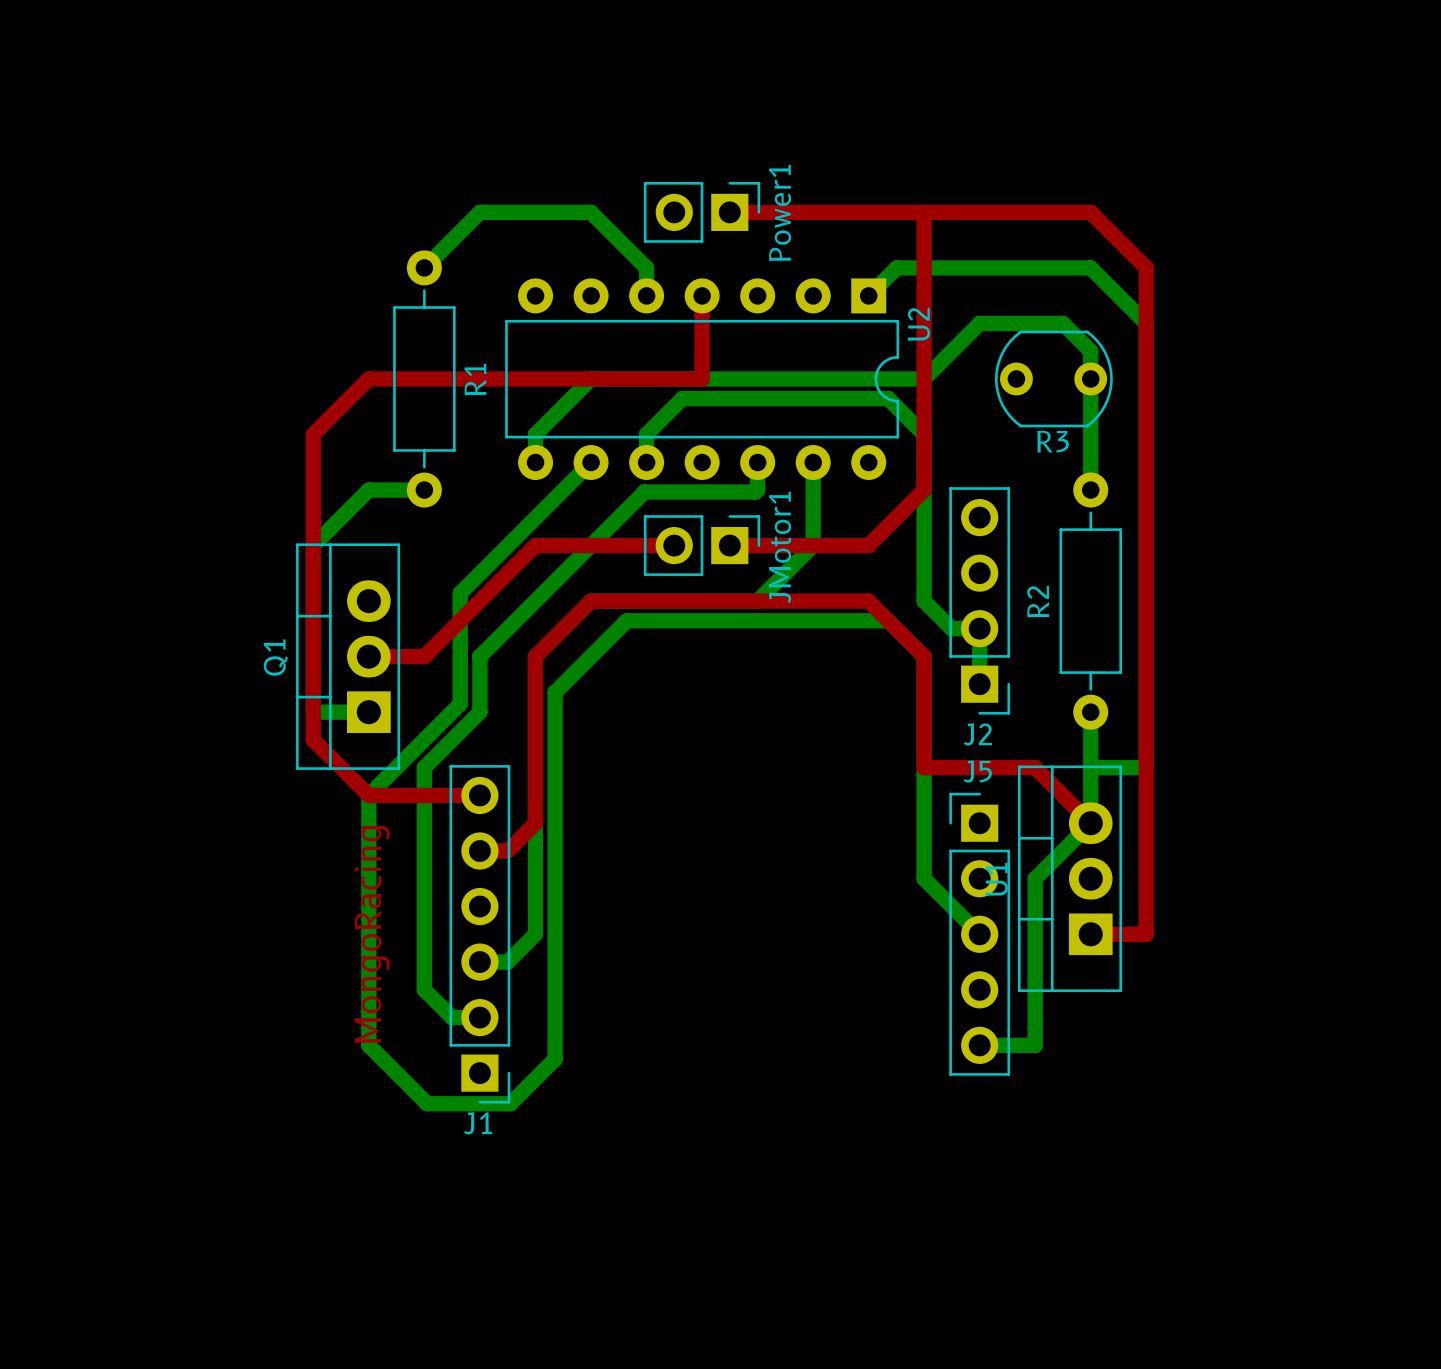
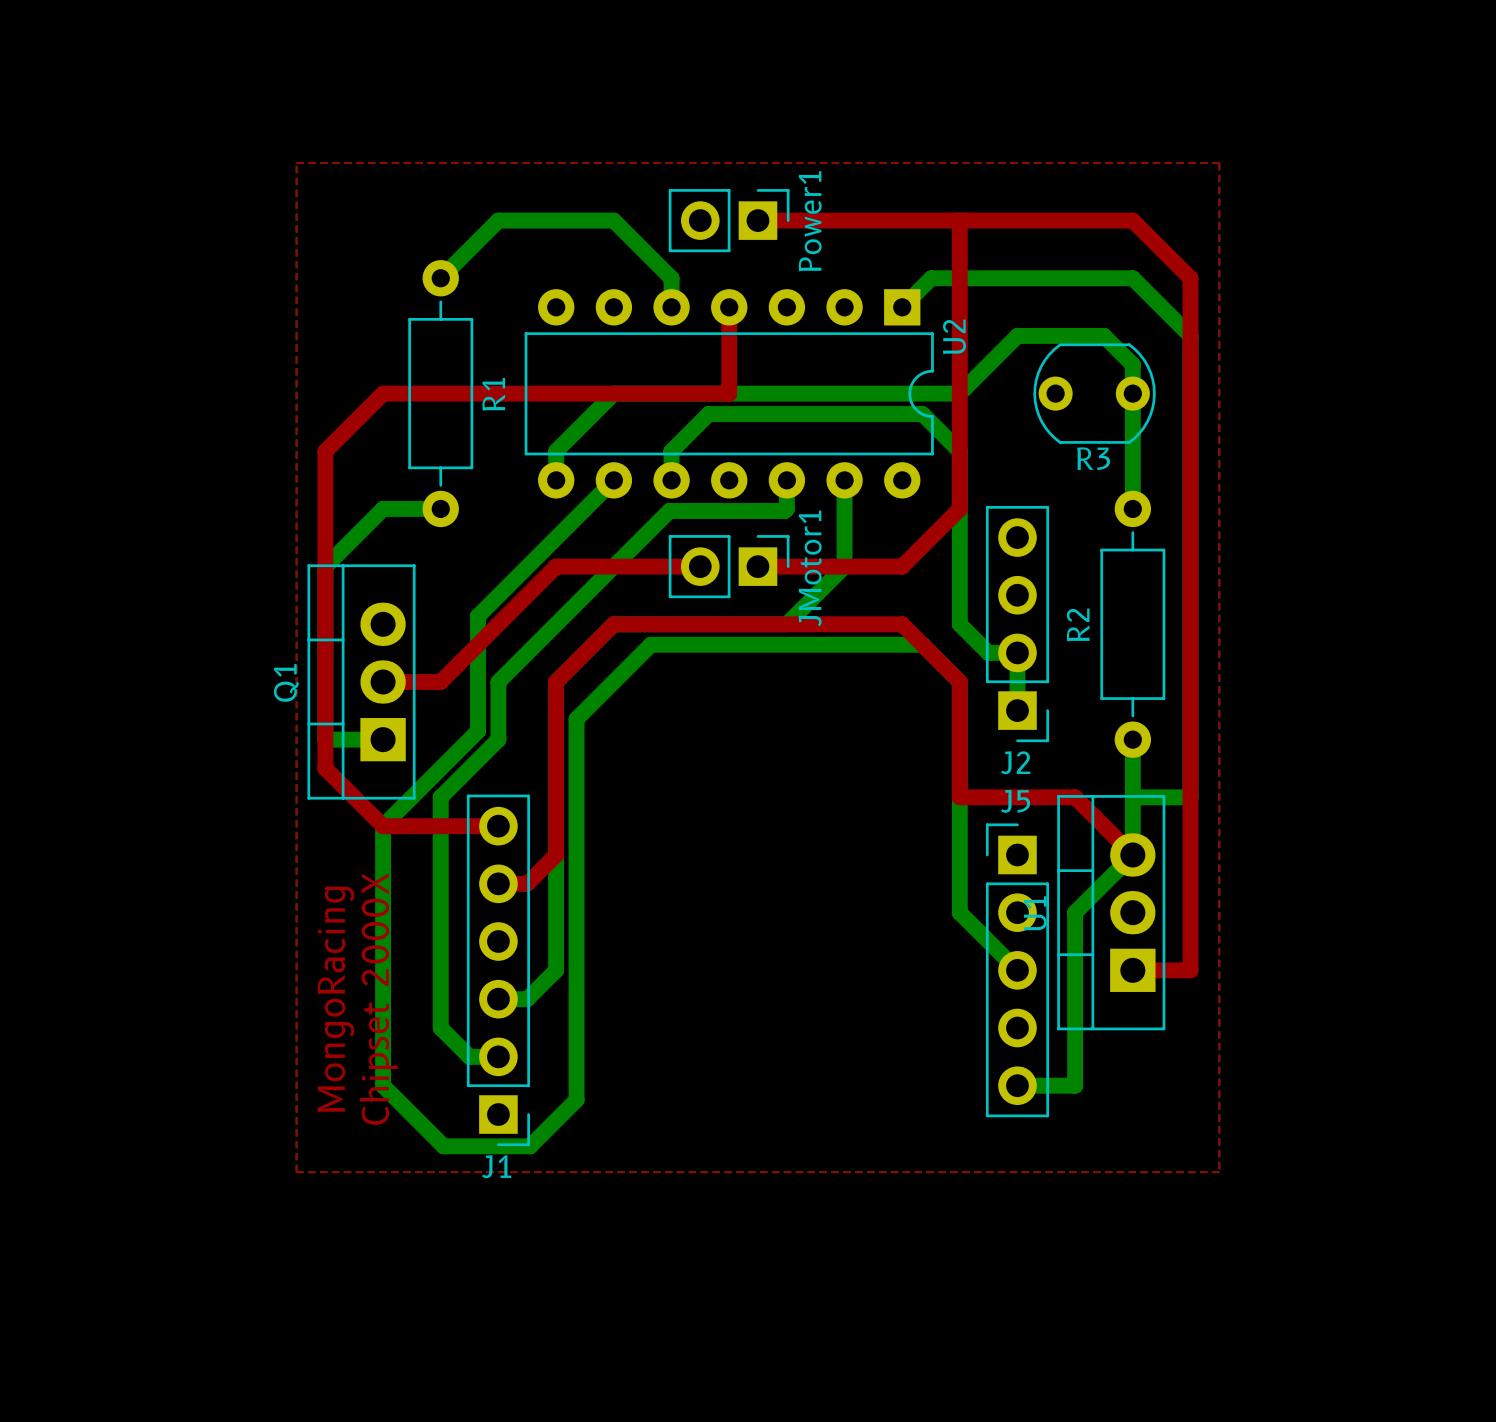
top zone outline: none -> (296, 162) (296, 1172) (1219, 1172) (1219, 162) (296, 162)
text position: MongoRacing (372, 934) -> MongoRacing (335, 999)
text: none -> Chipset 2000X (378, 998)

